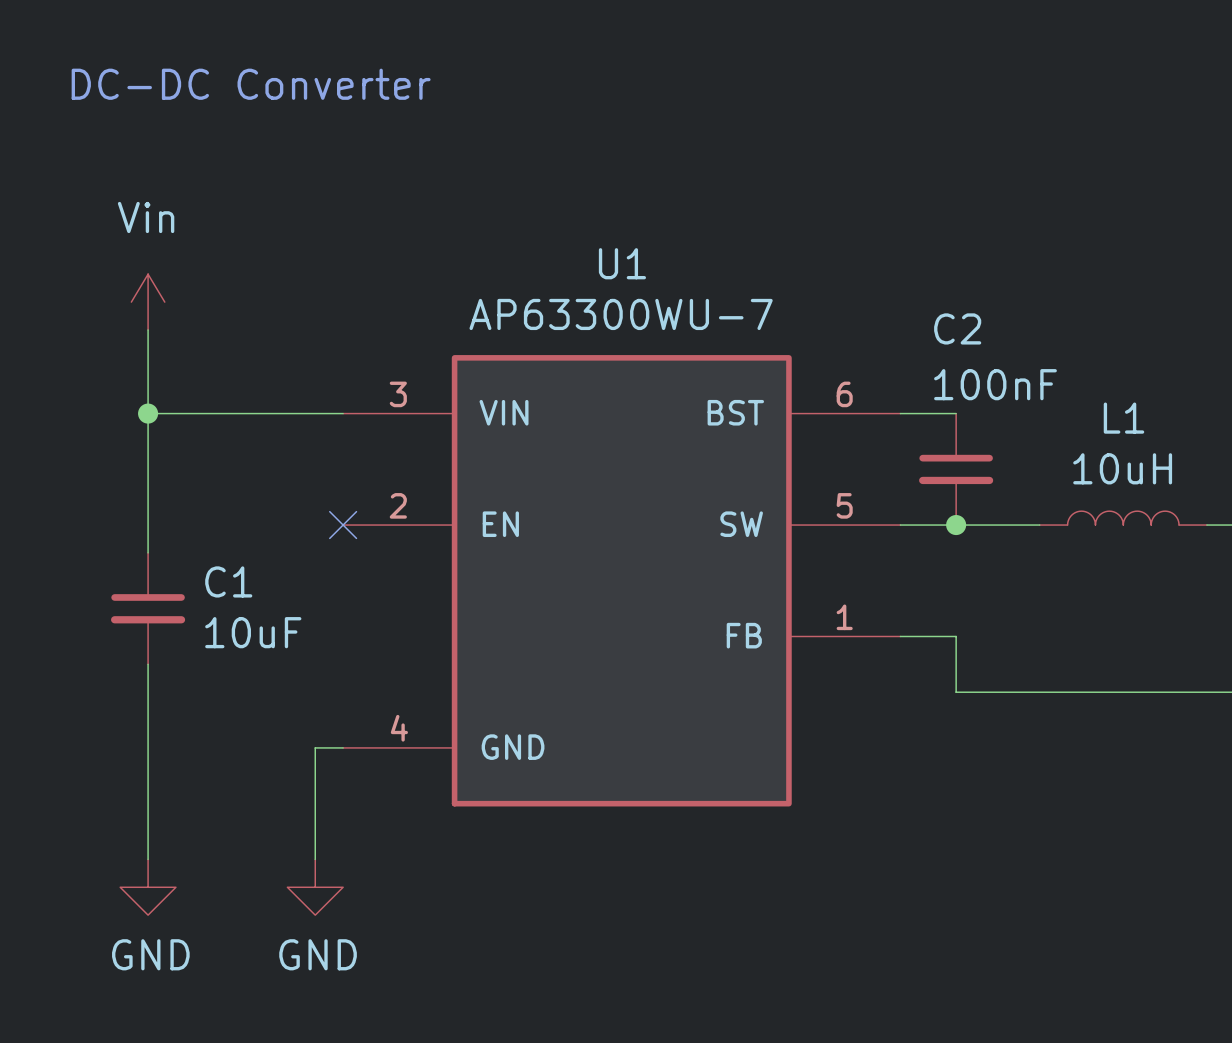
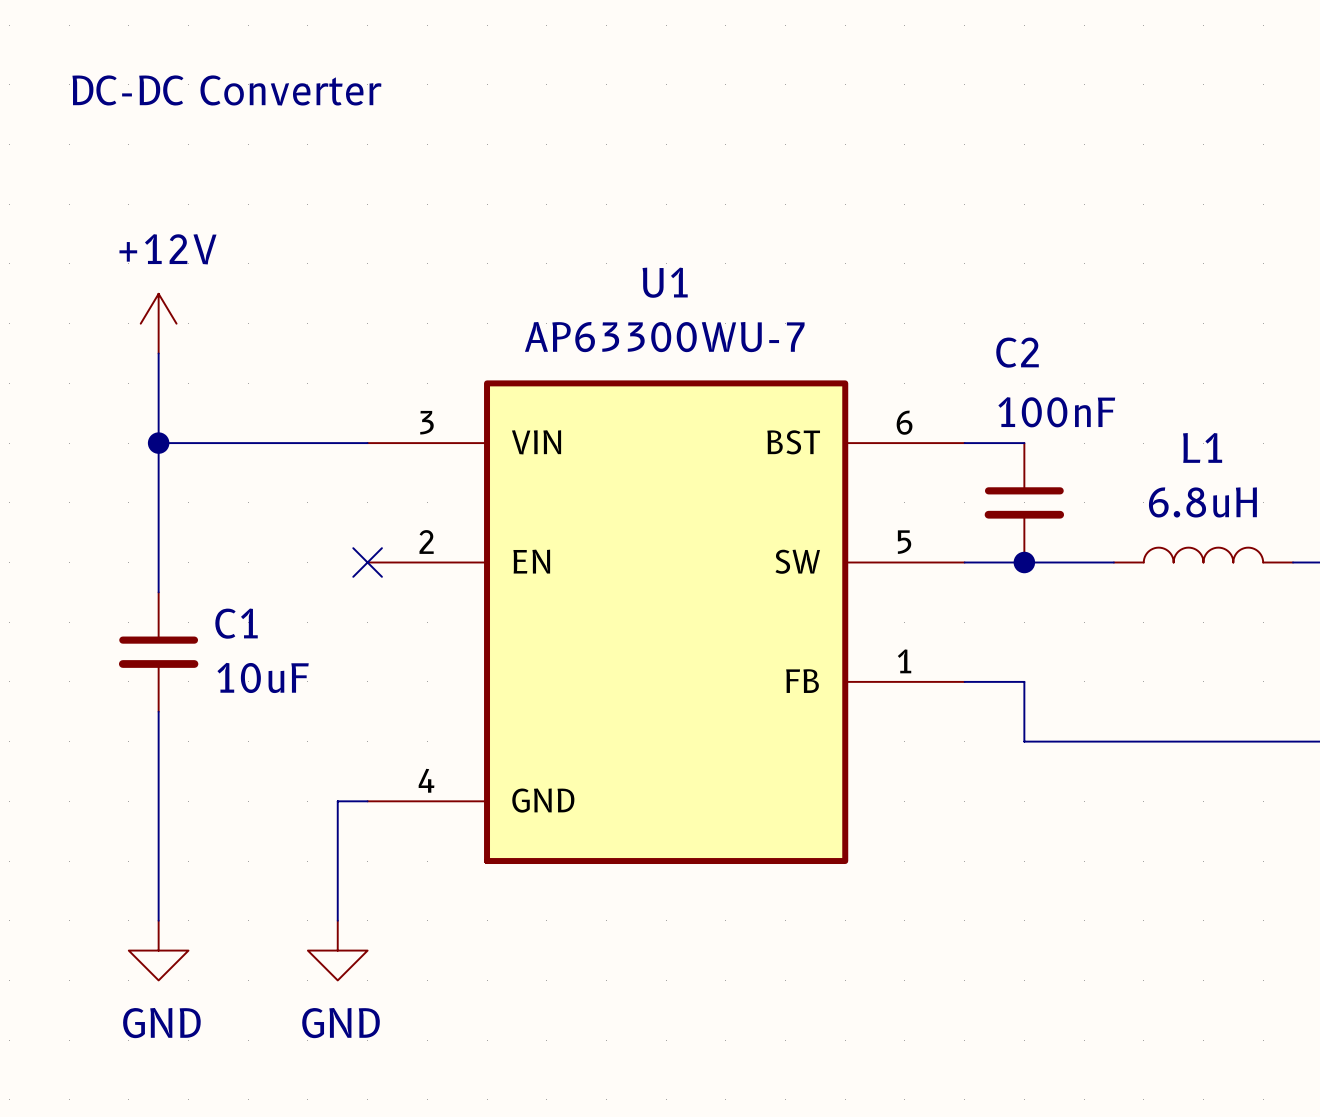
power symbol: Vin (148, 302) -> +12V (158, 323)
L1 value: 10uH (1122, 468) -> 6.8uH (1202, 502)

